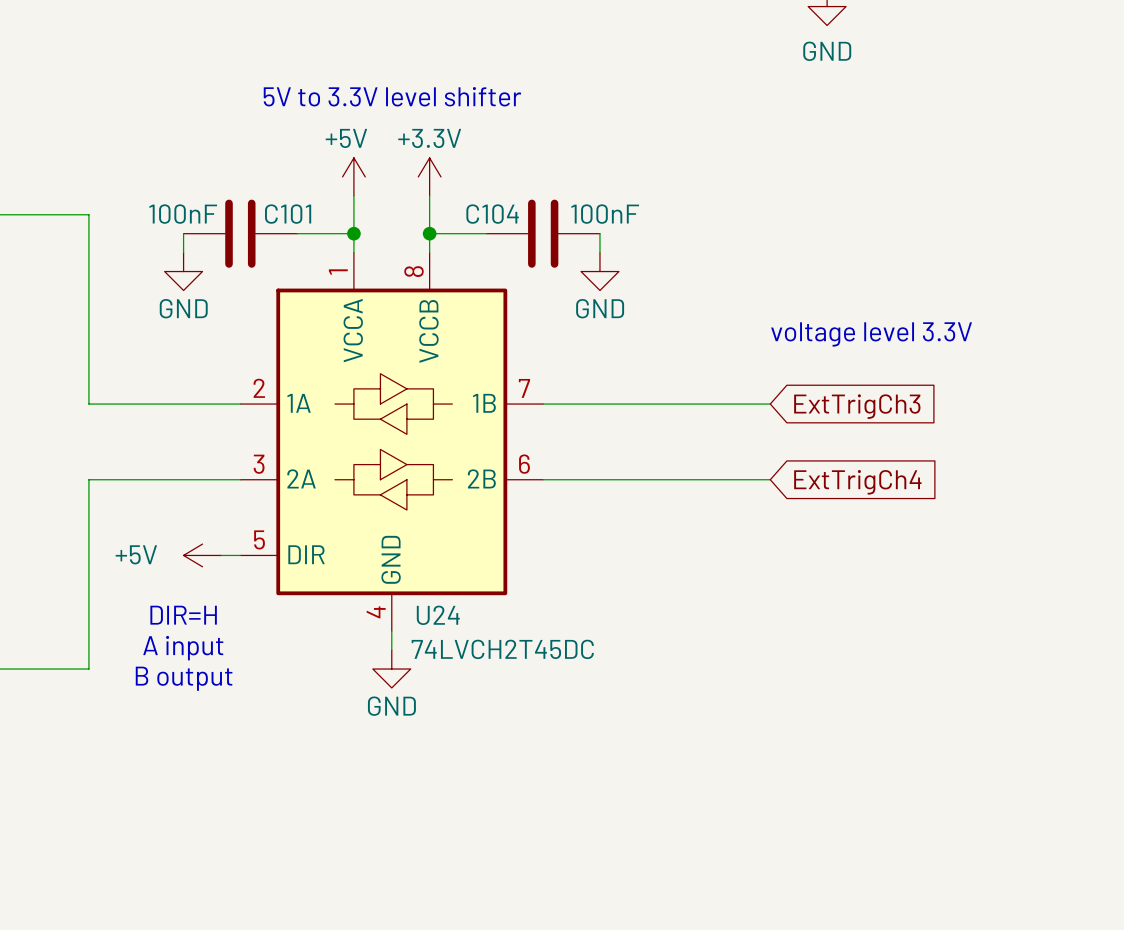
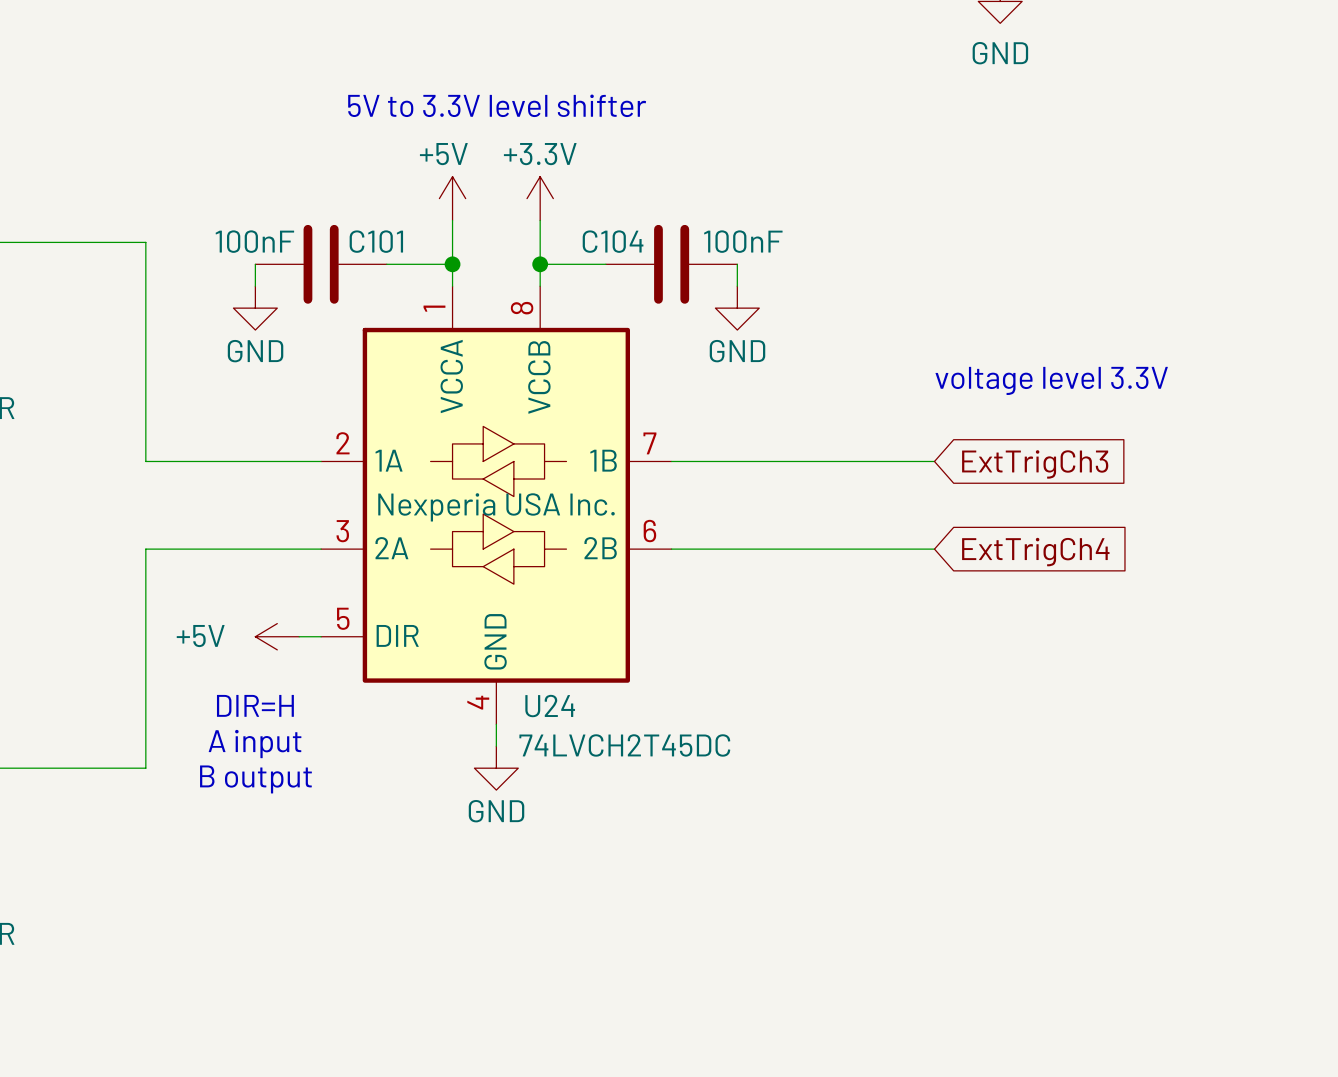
U24 text: none -> Nexperia USA Inc. (496, 507)

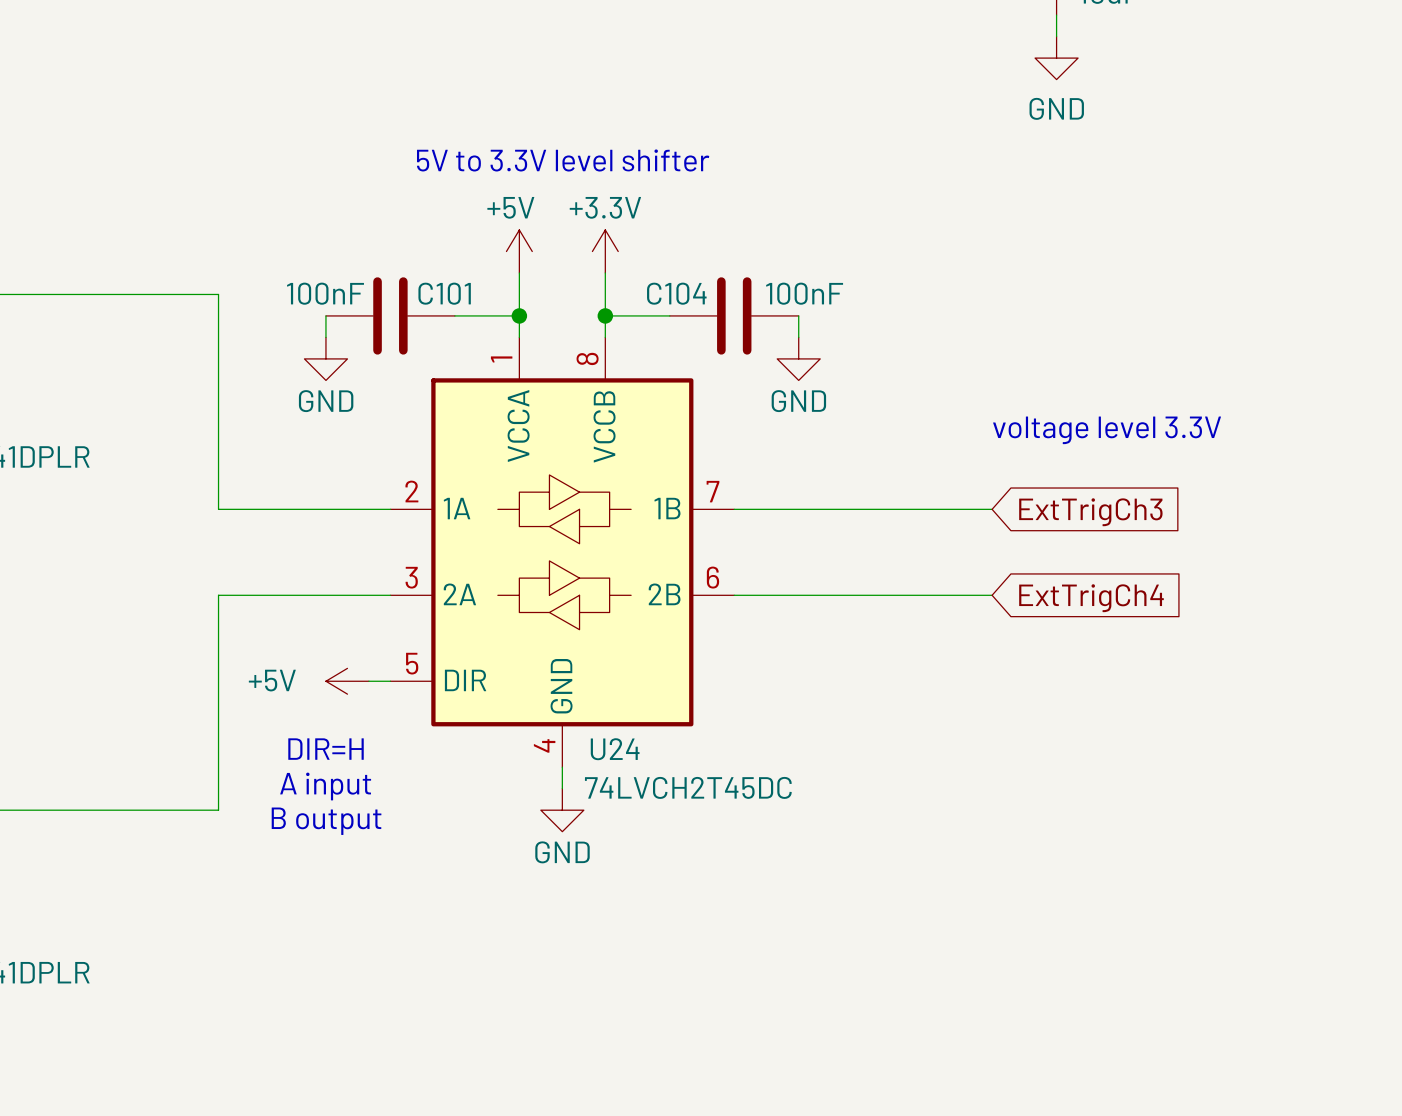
U24 text: Nexperia USA Inc. (496, 507) -> none

